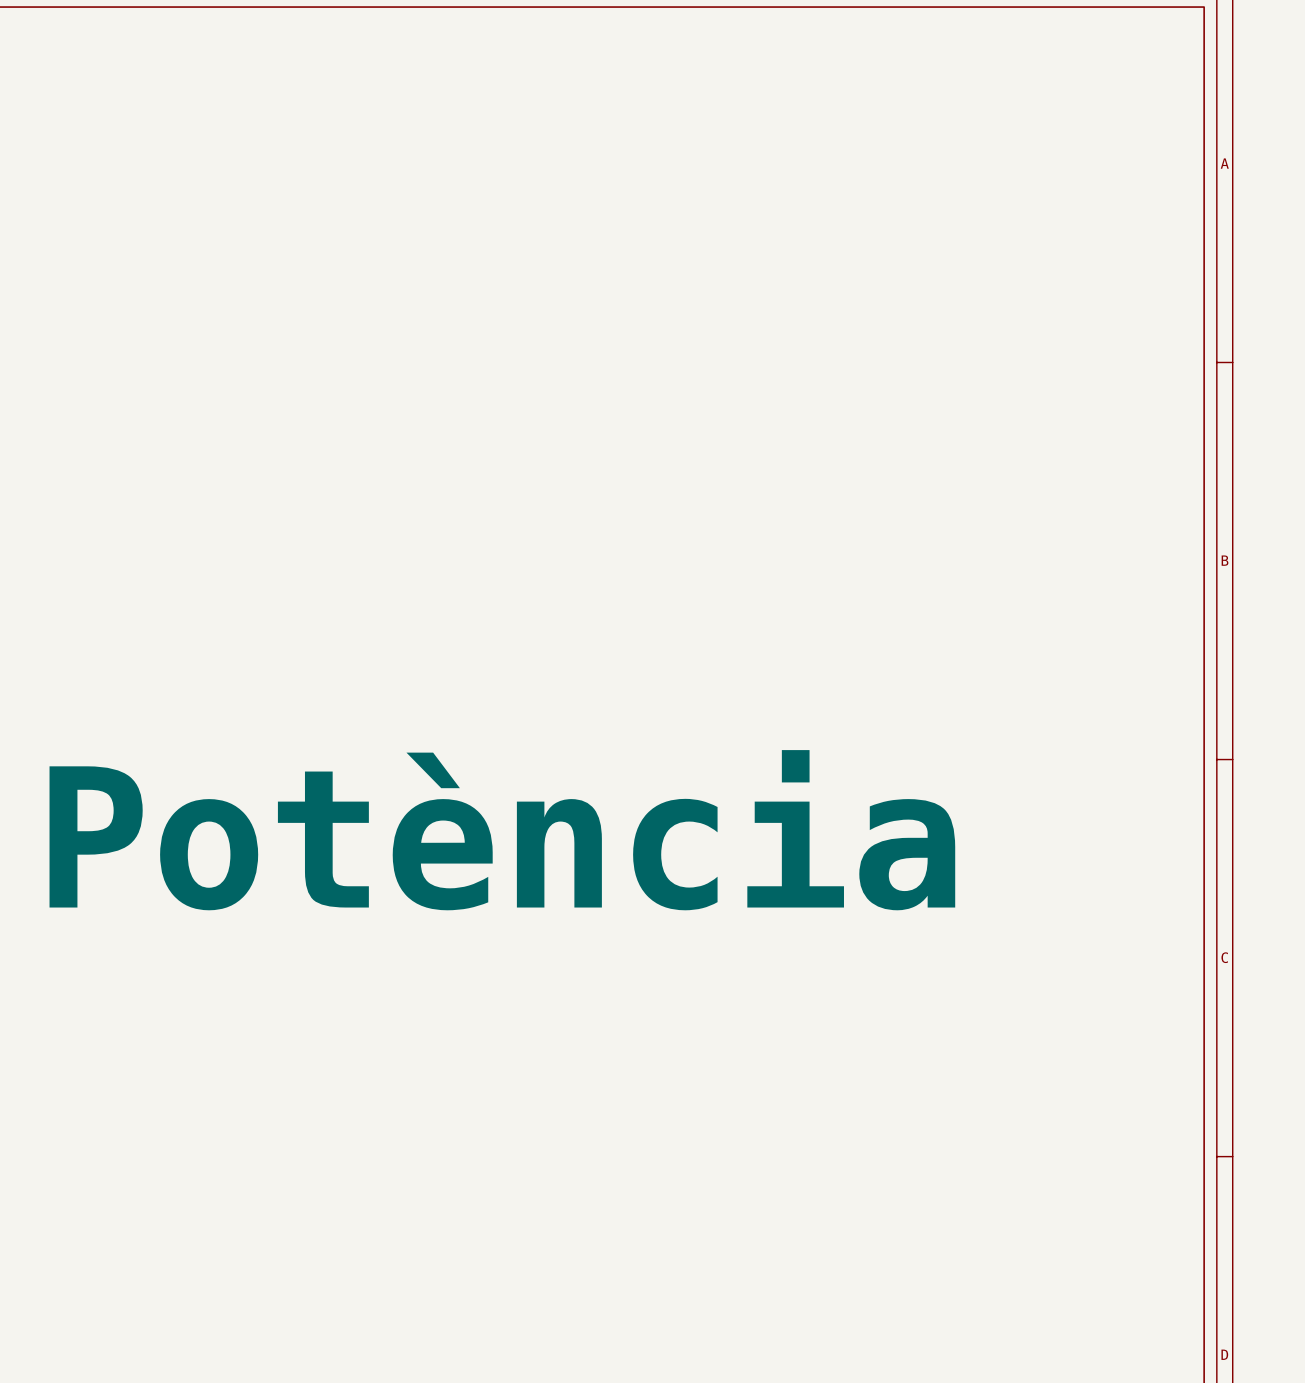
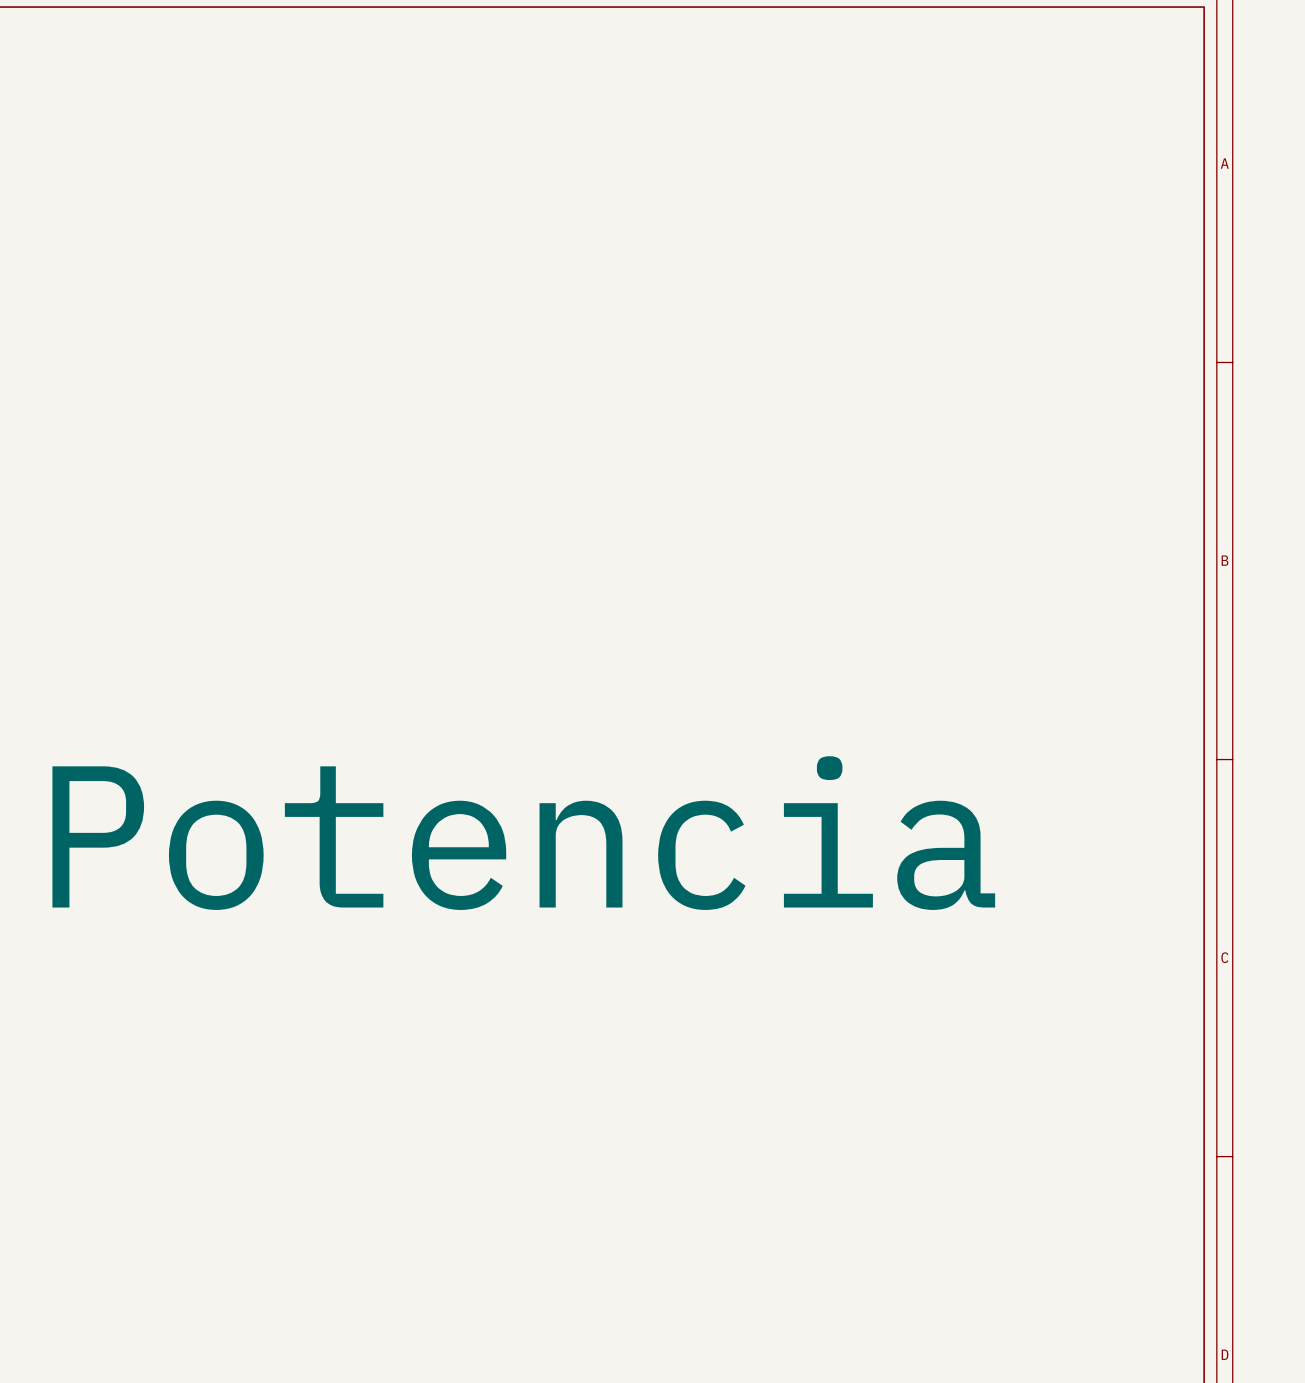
sheet Potència name: Potència (502, 830) -> Potencia (523, 833)

